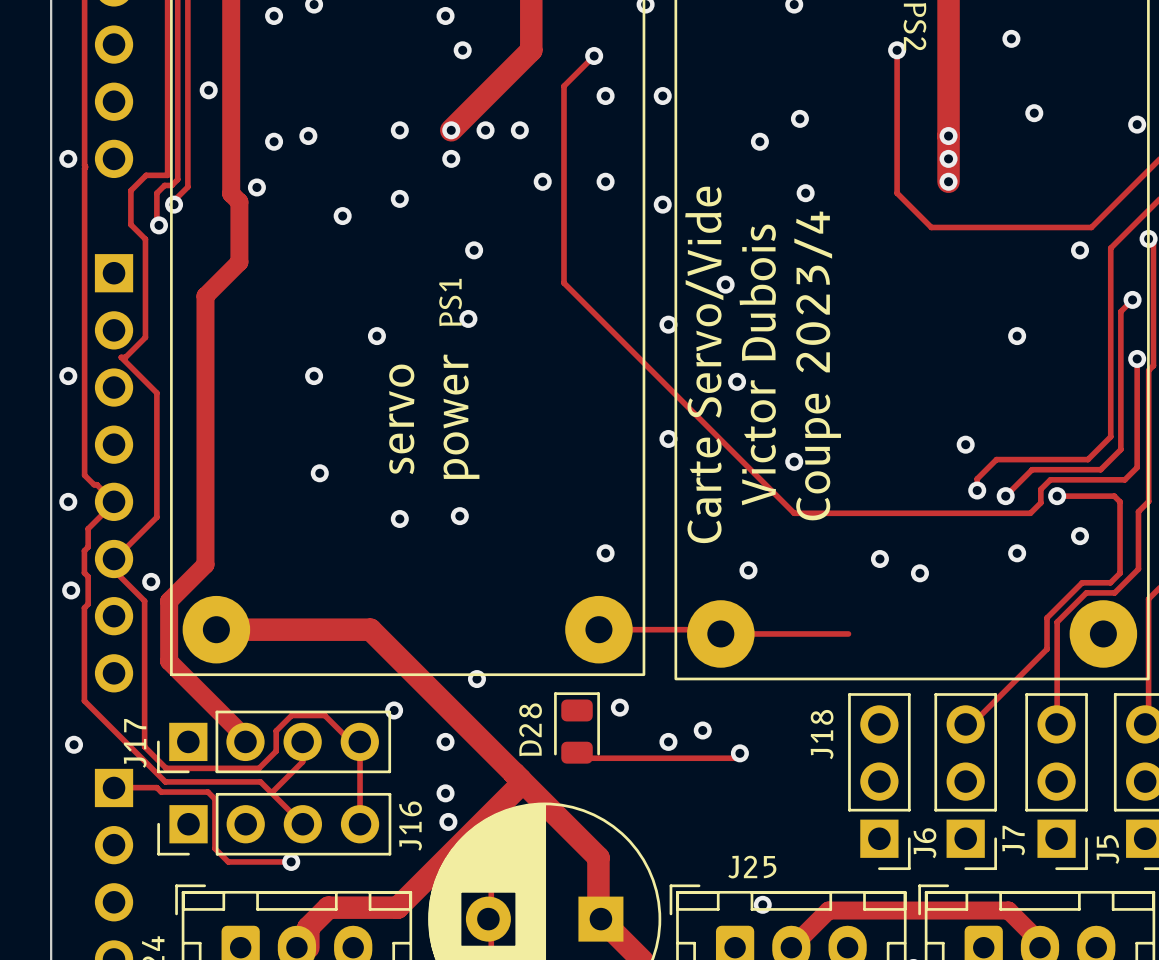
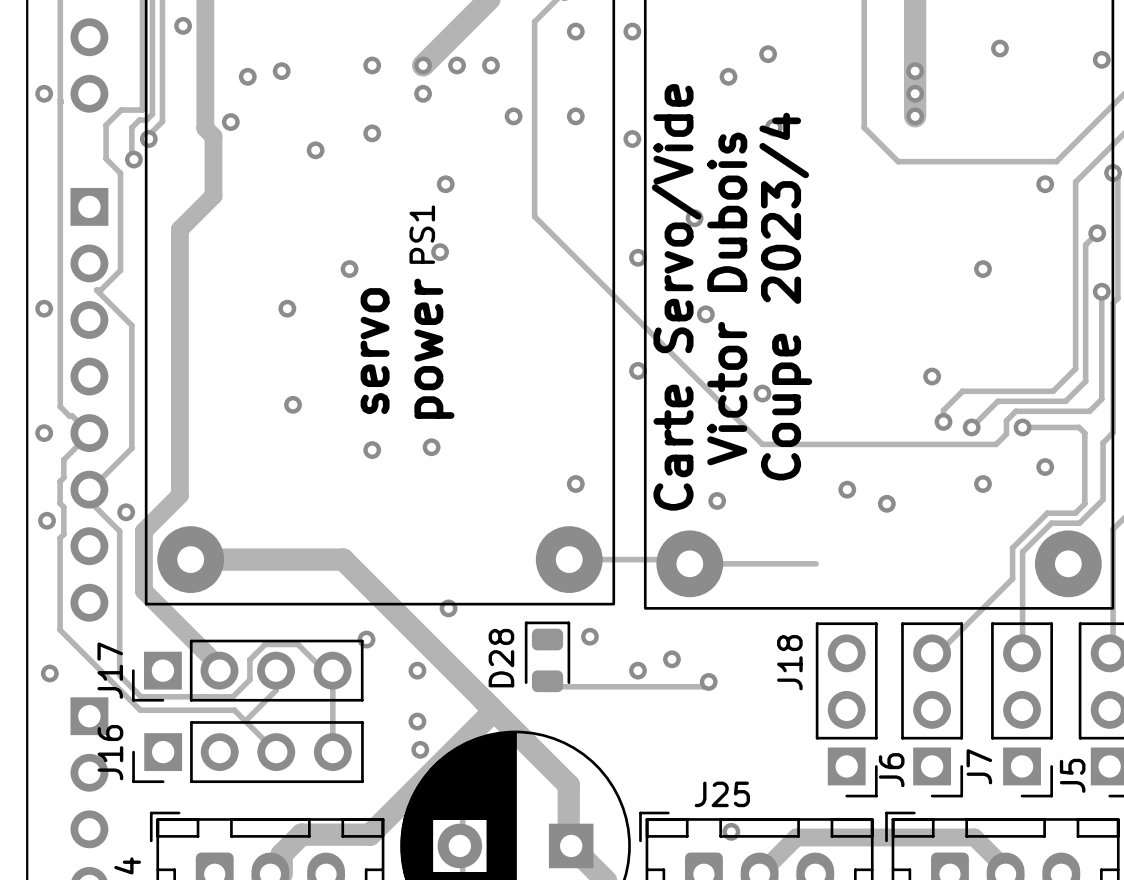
track: (114, 787) (156, 787) (161, 792) (207, 792) (214, 799) (214, 848) (228, 861) (291, 861) -> none
J16 name position: J16 (410, 826) -> J16 (110, 752)
via: (291, 861) -> none

